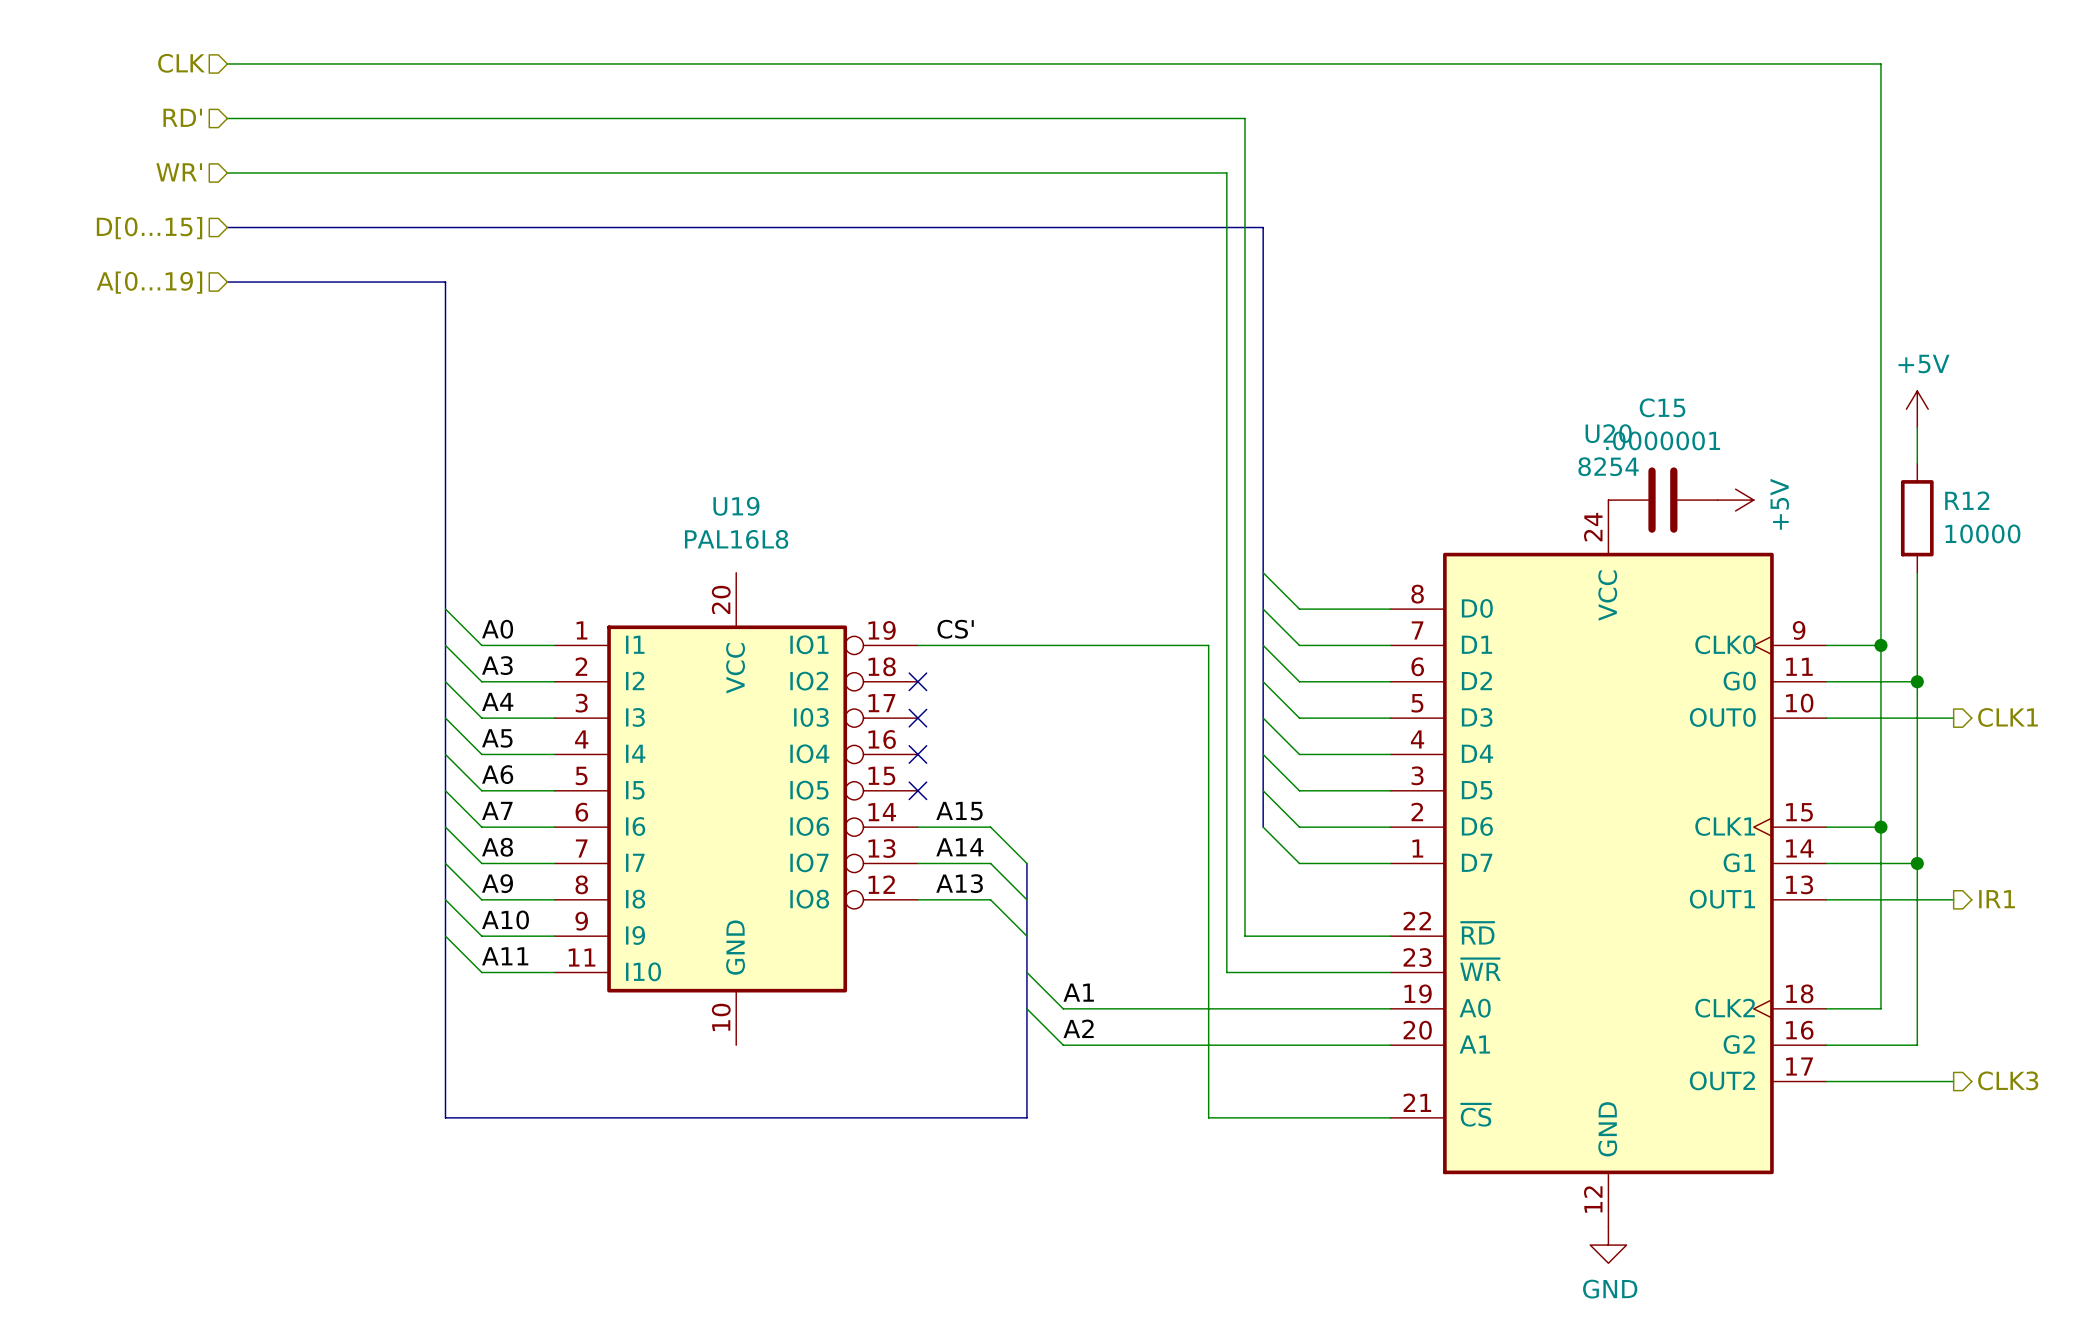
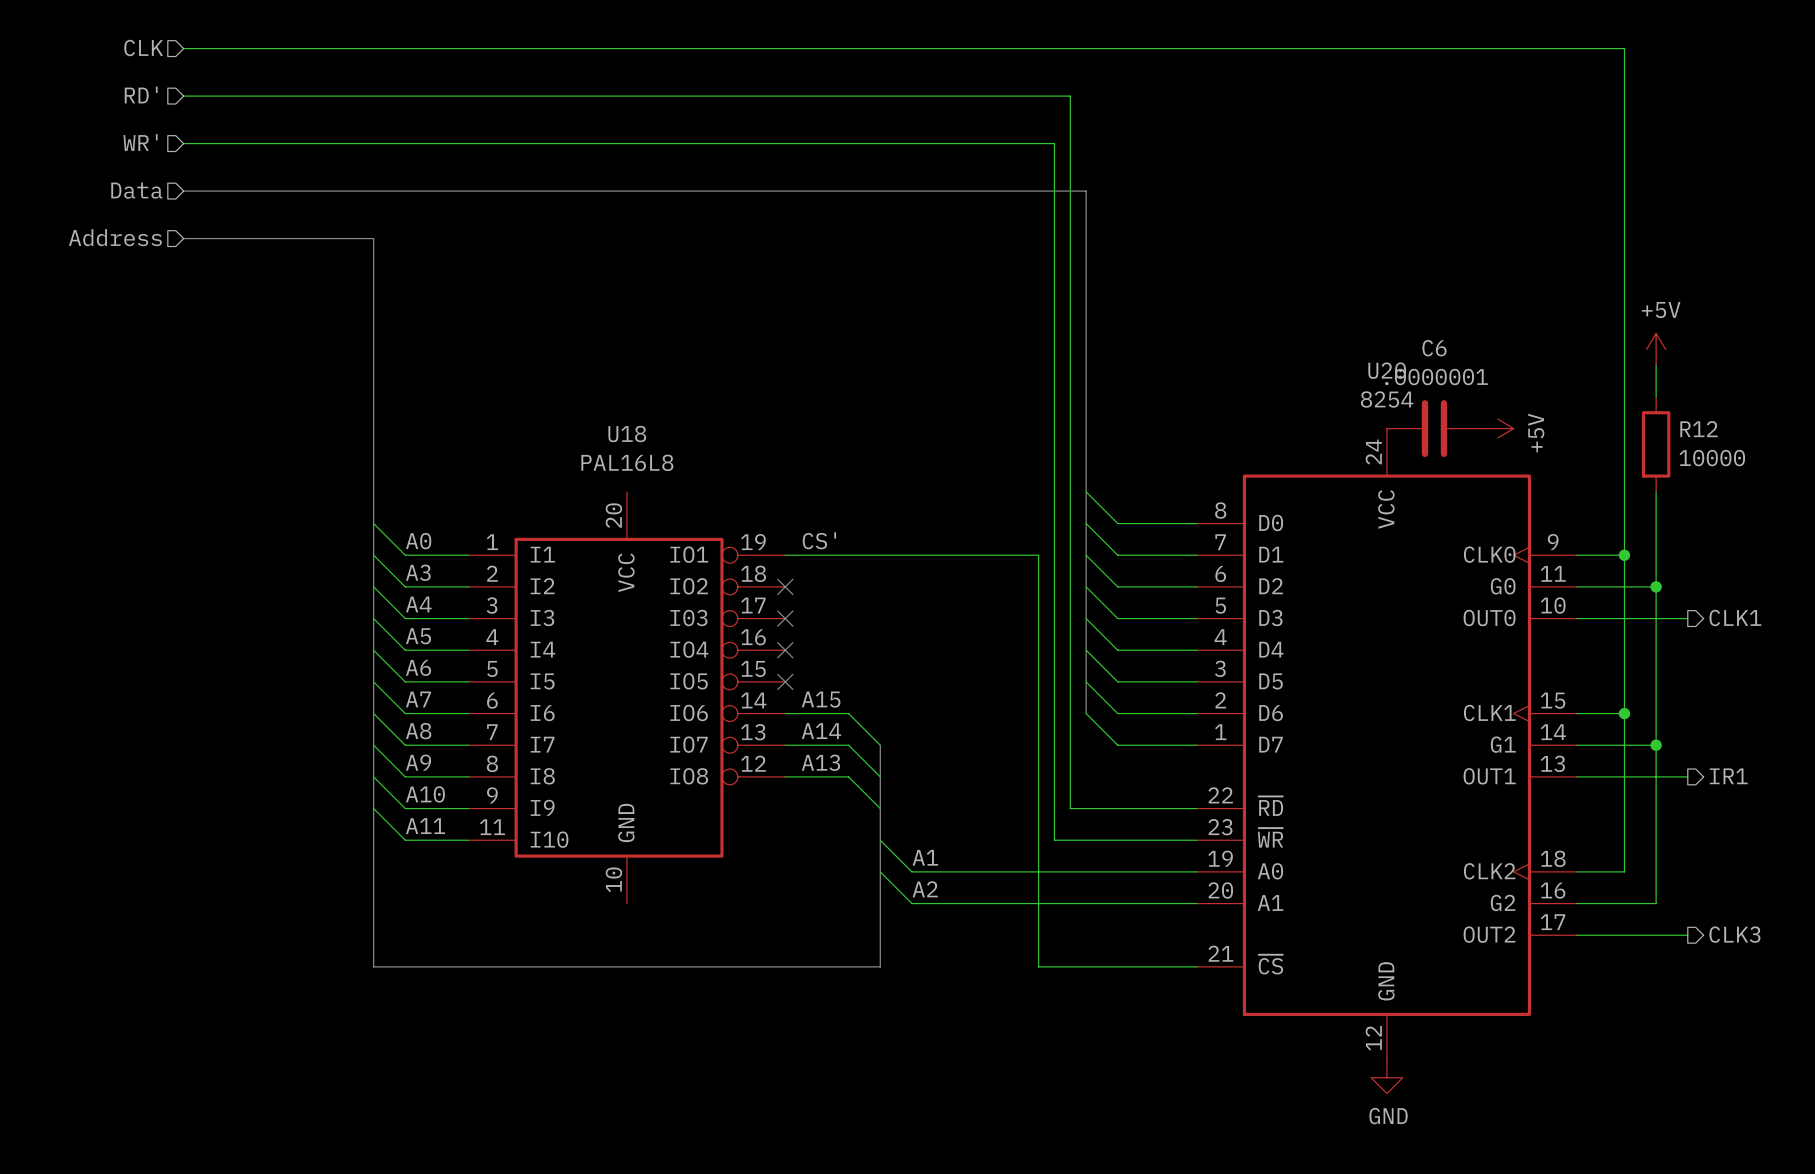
hierarchical label: D[0...15] (149, 228) -> Data (136, 190)
hierarchical label: A[0...19] (149, 282) -> Address (115, 237)
C15 name: C15 (1662, 407) -> C6 (1434, 348)
U19 name: U19 (736, 506) -> U18 (627, 434)

